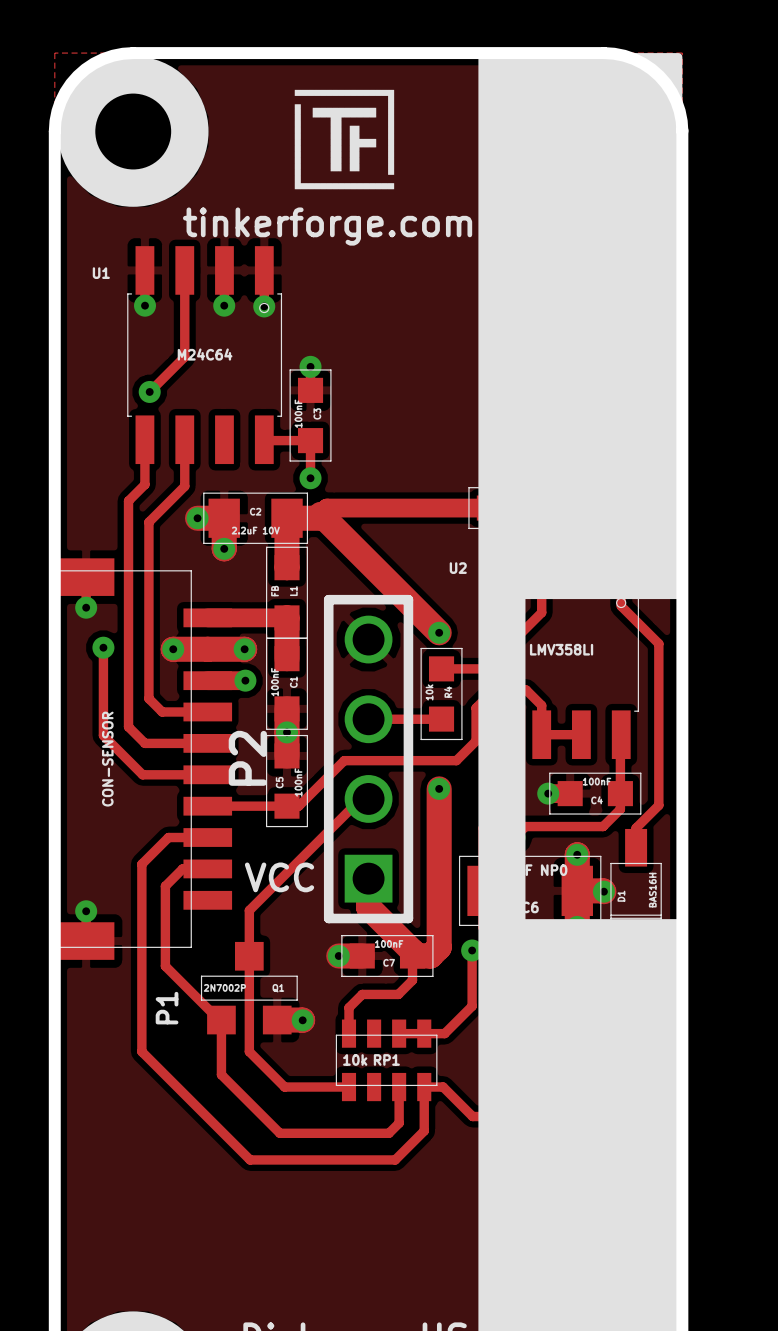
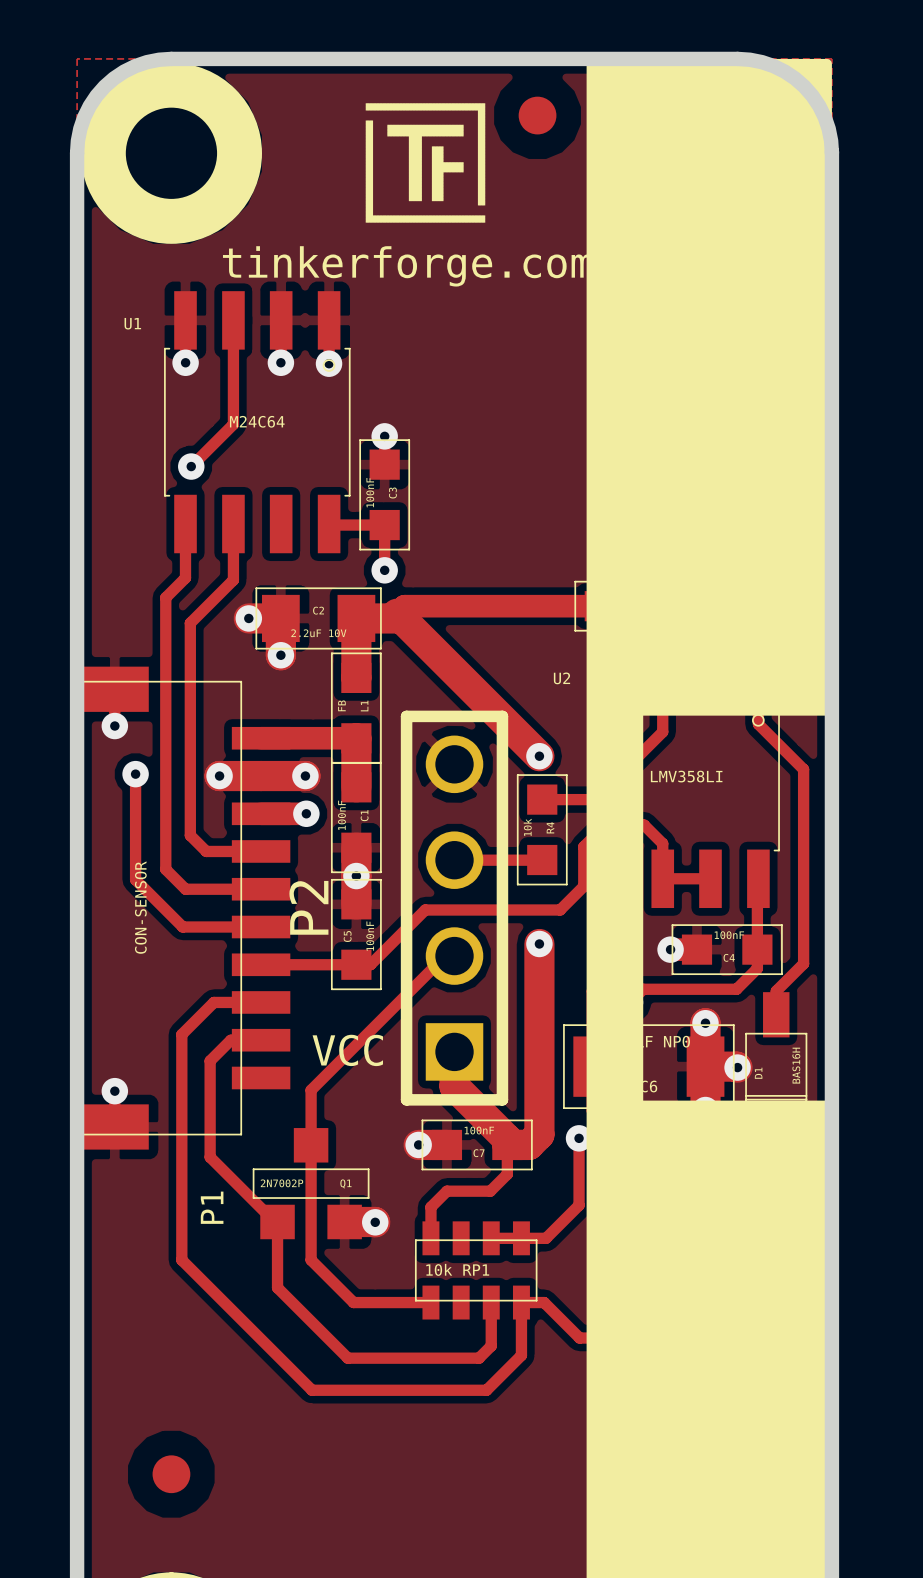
part: none -> (537, 115)
part: none -> (171, 1474)

